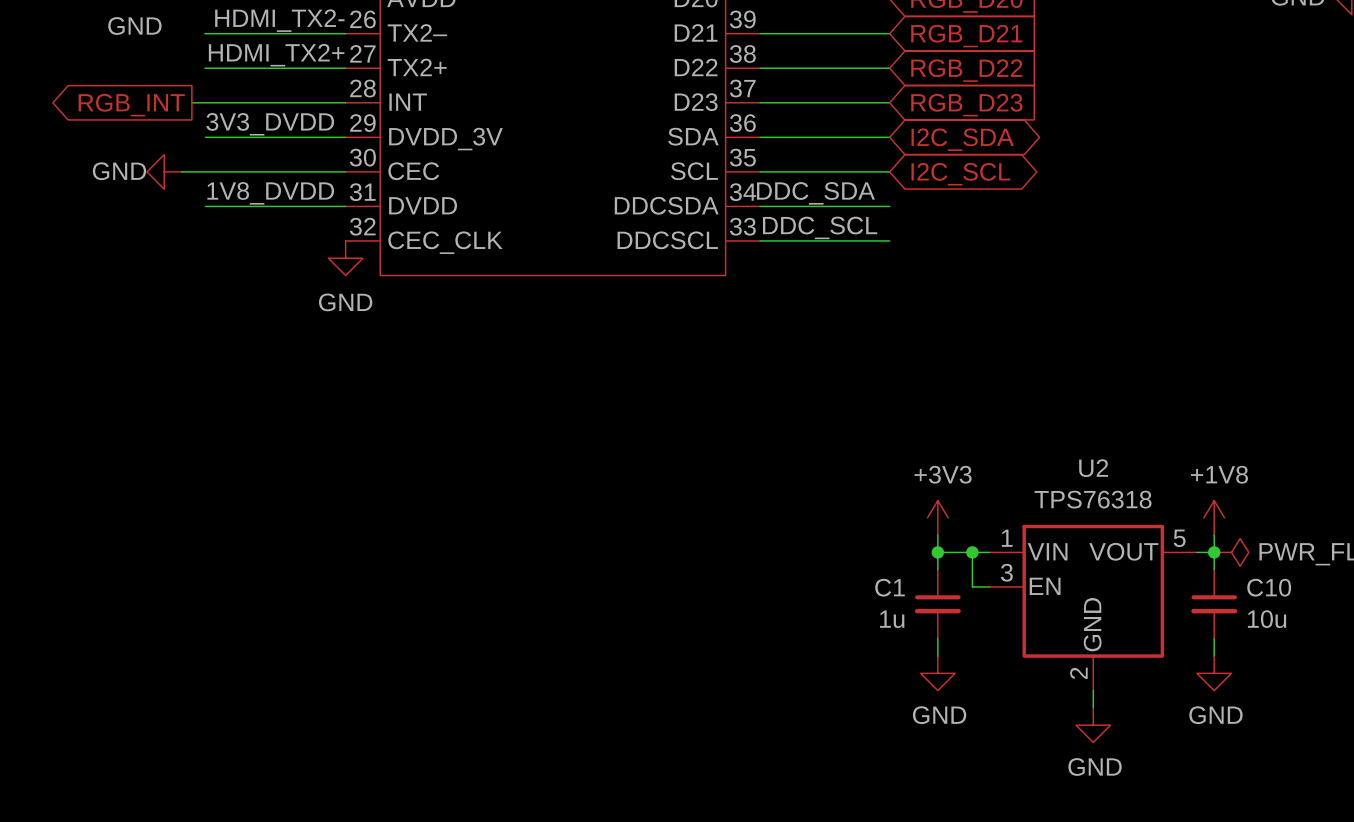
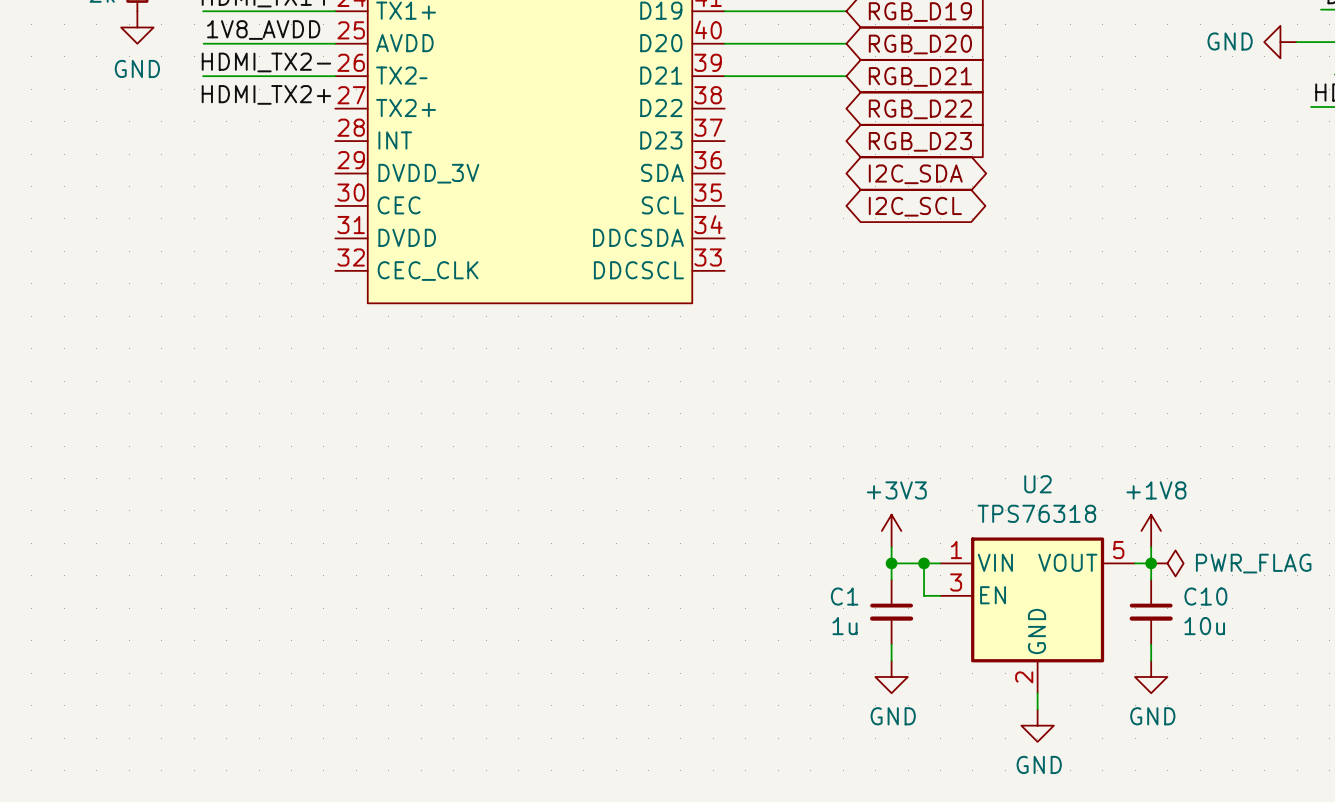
wire: (204, 68) (345, 68) -> none
wire: (760, 68) (889, 68) -> none
wire: (191, 102) (345, 102) -> none
wire: (760, 102) (889, 102) -> none
global label: RGB_INT (131, 105) -> none
label: 3V3_DVDD (270, 124) -> none
wire: (205, 137) (345, 137) -> none
wire: (760, 137) (889, 137) -> none
power symbol: GND (164, 171) -> none
wire: (181, 171) (345, 171) -> none
wire: (760, 171) (889, 171) -> none
label: 1V8_DVDD (270, 193) -> none
label: DDC_SDA (815, 193) -> none
wire: (205, 206) (345, 206) -> none
wire: (760, 206) (889, 206) -> none
label: DDC_SCL (820, 227) -> none
wire: (760, 240) (889, 240) -> none
power symbol: GND (345, 258) -> none

